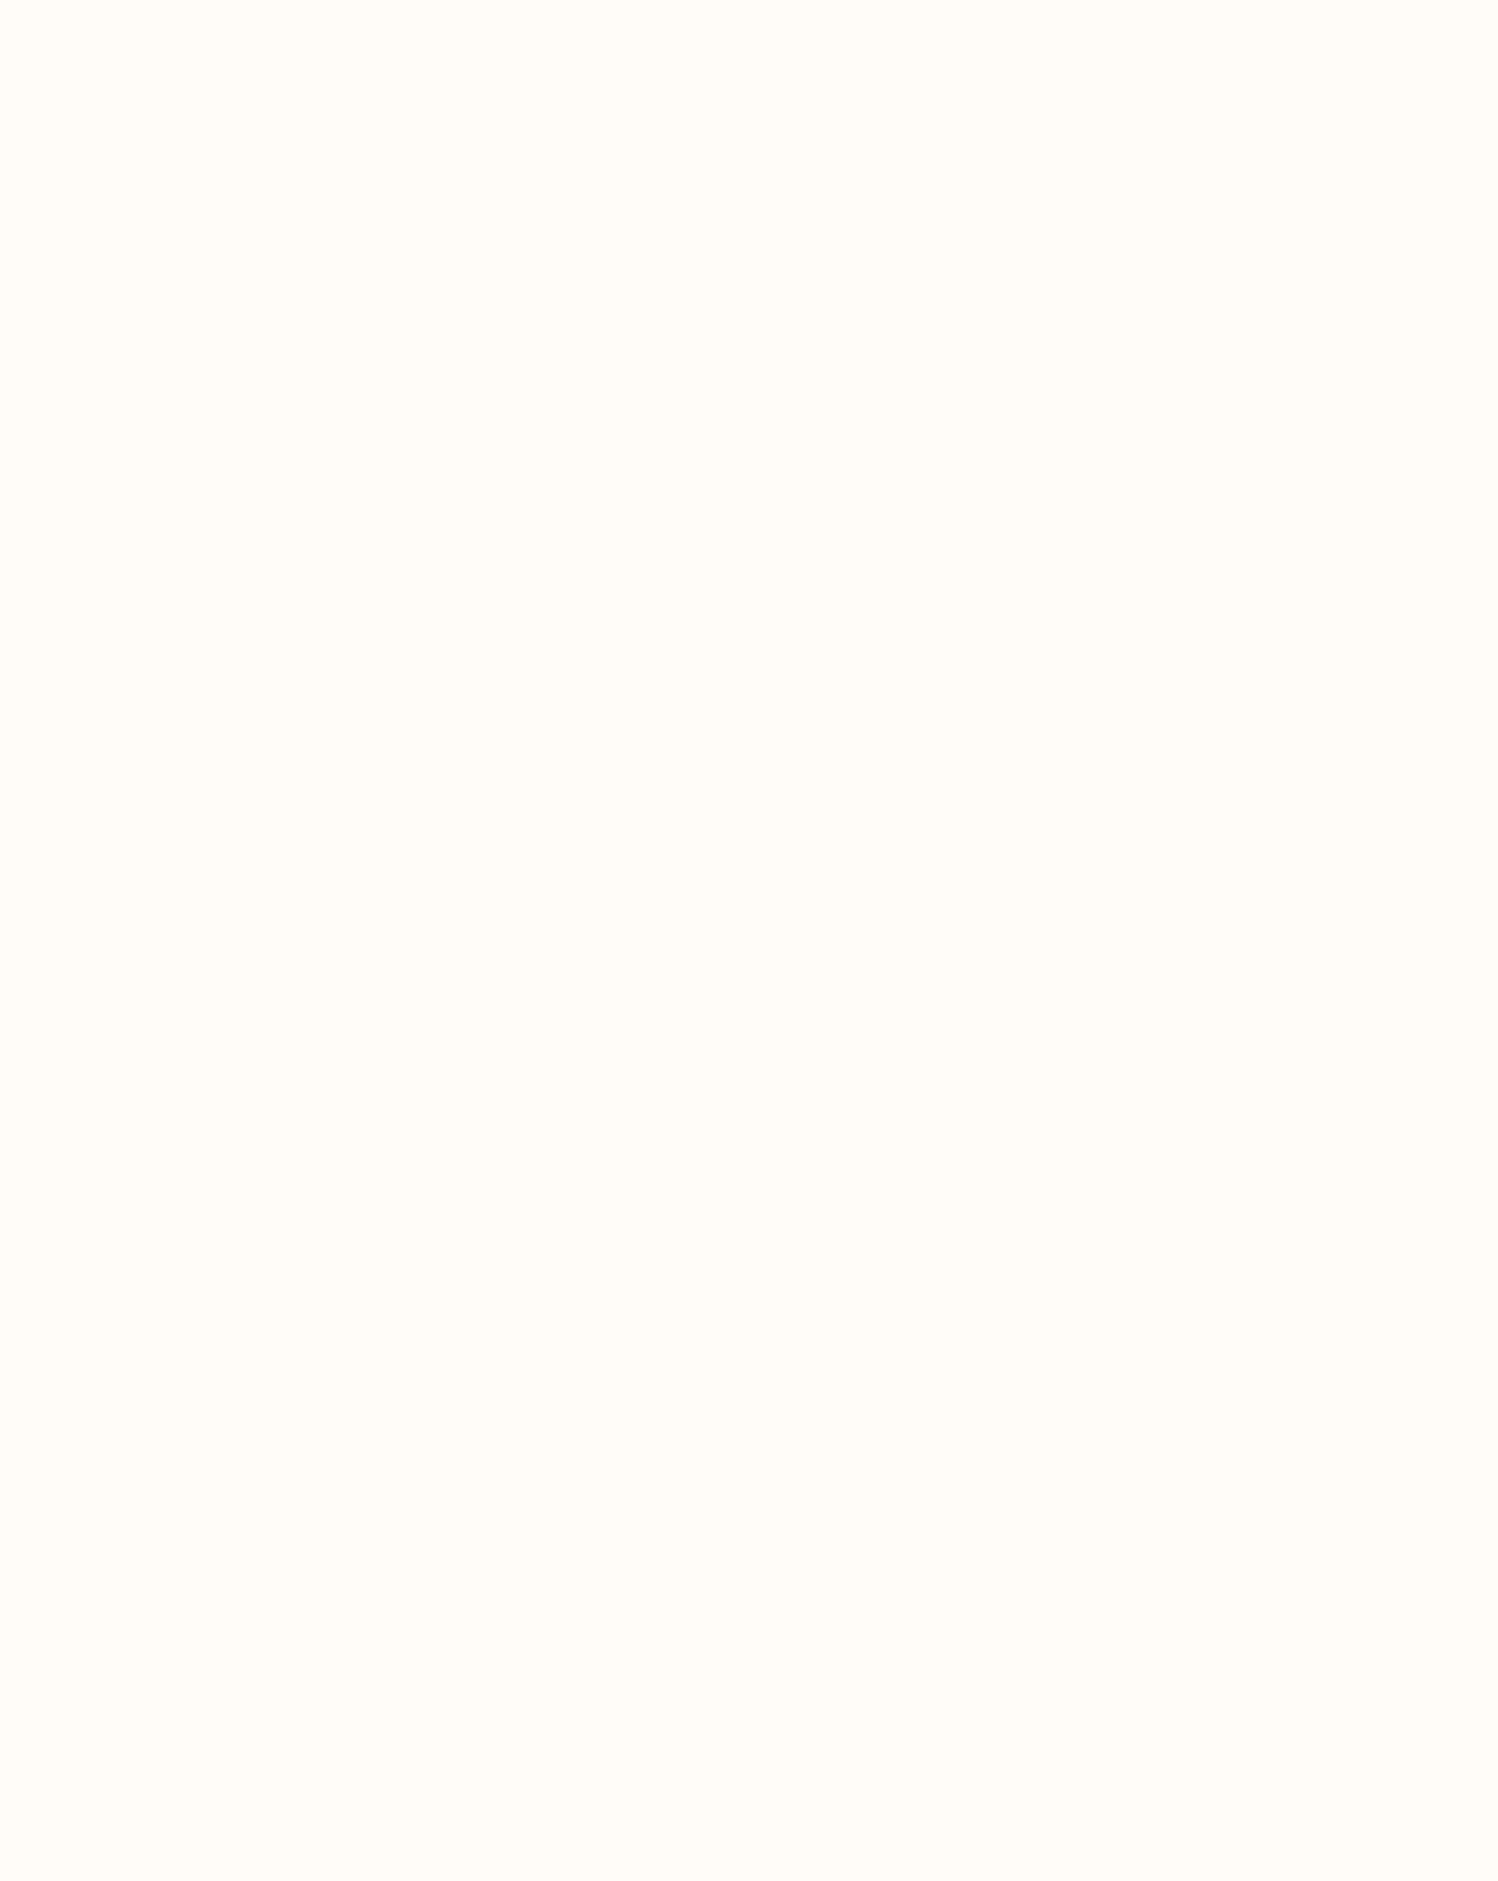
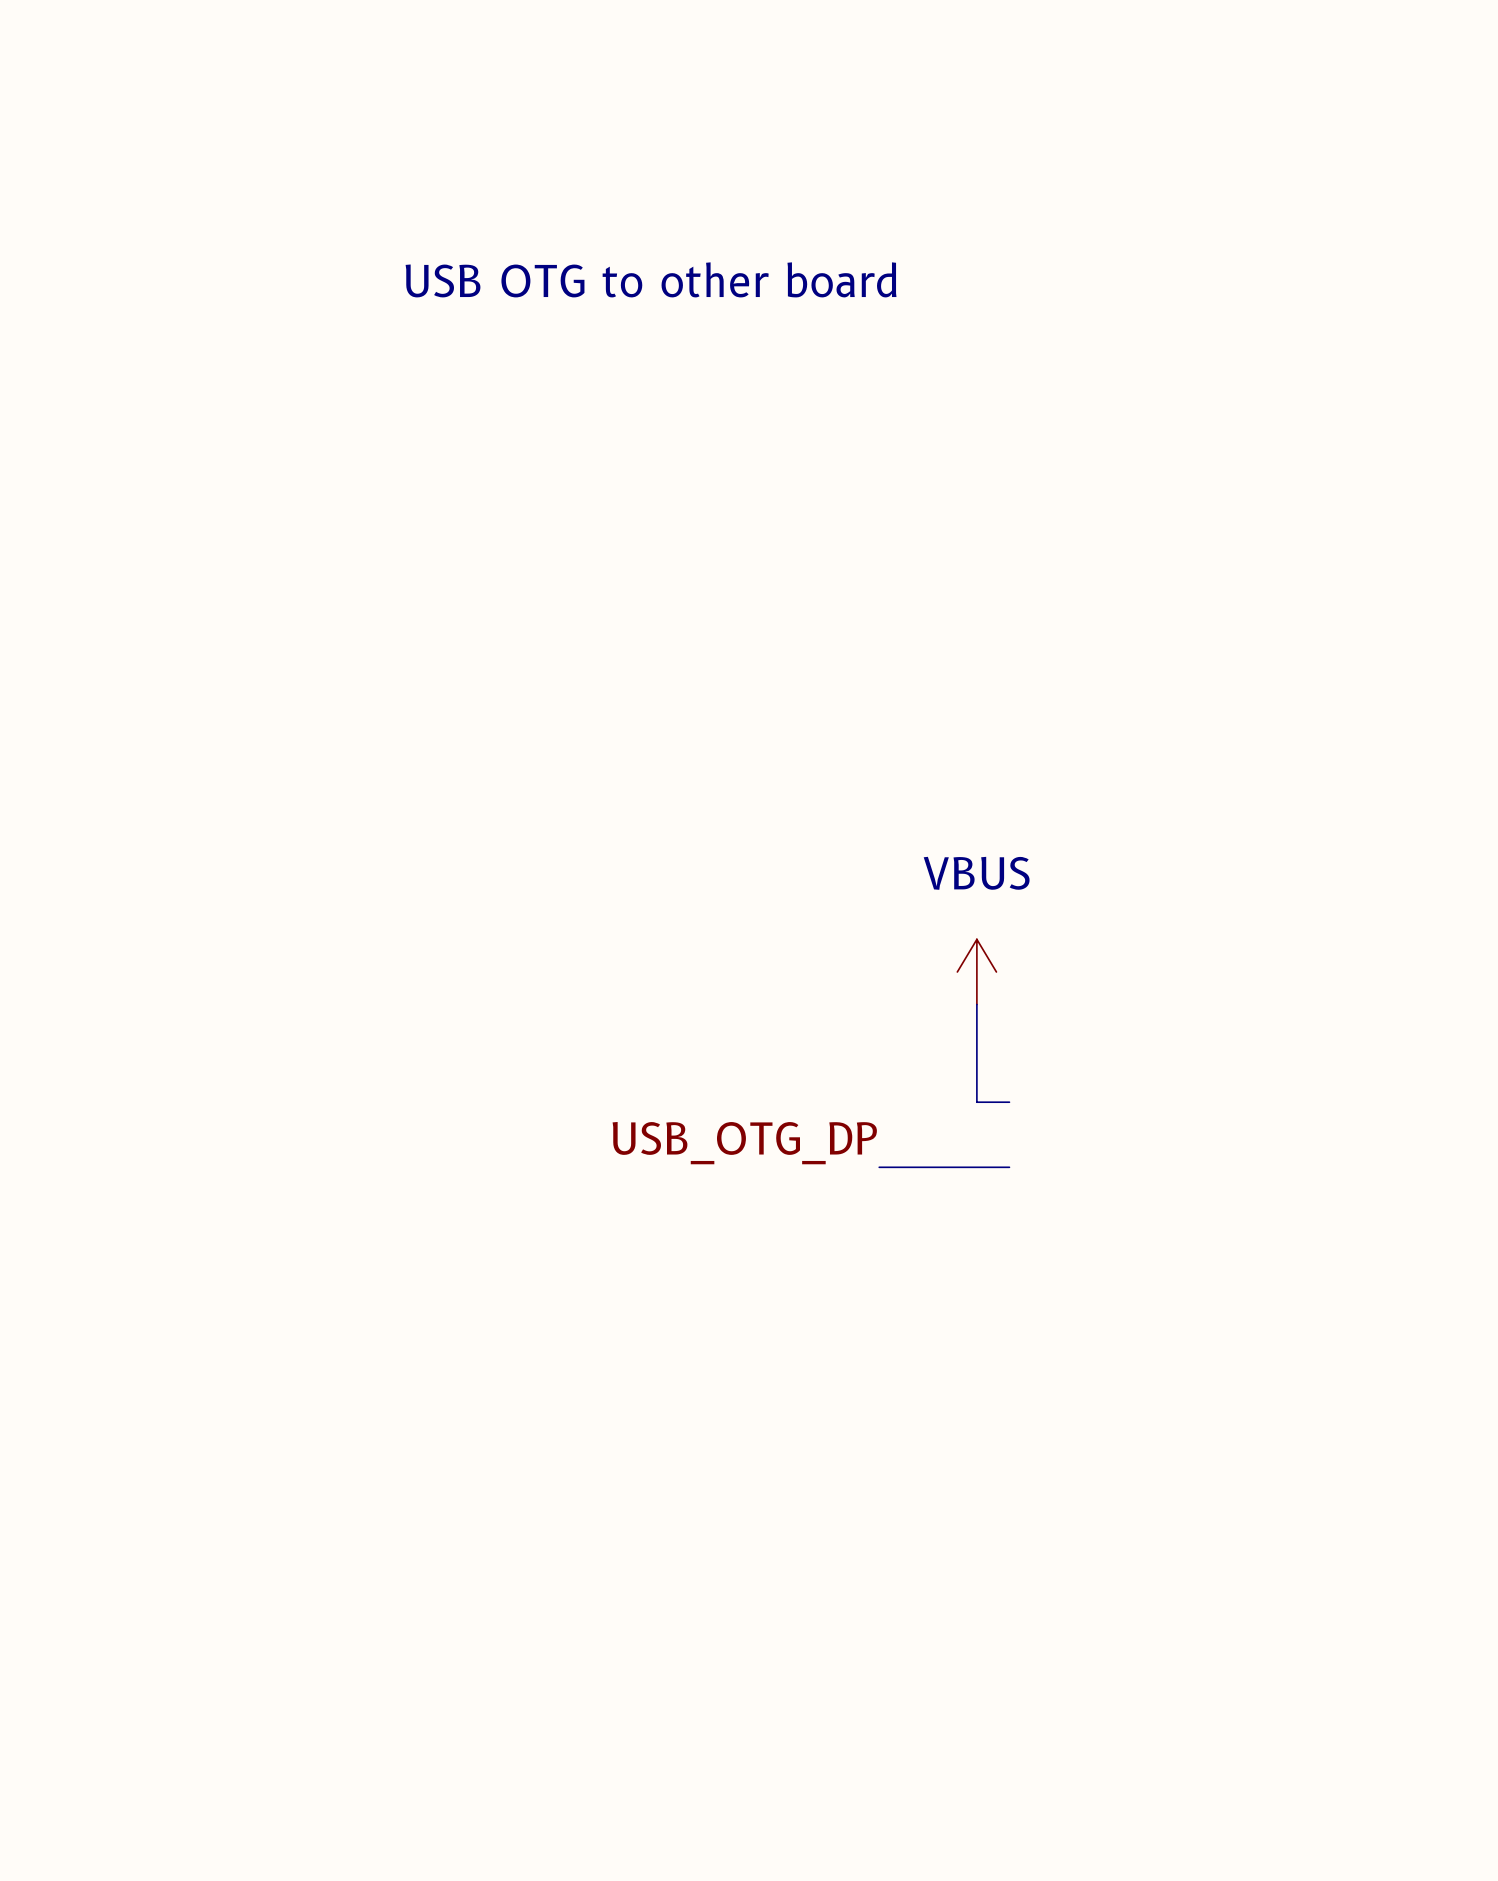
text: none -> USB OTG to other board (651, 279)
power symbol: none -> VBUS (976, 971)
wire: none -> (976, 1004) (976, 1102) (1009, 1102)
label: none -> USB_OTG_DP (744, 1143)
wire: none -> (879, 1167) (1009, 1167)

